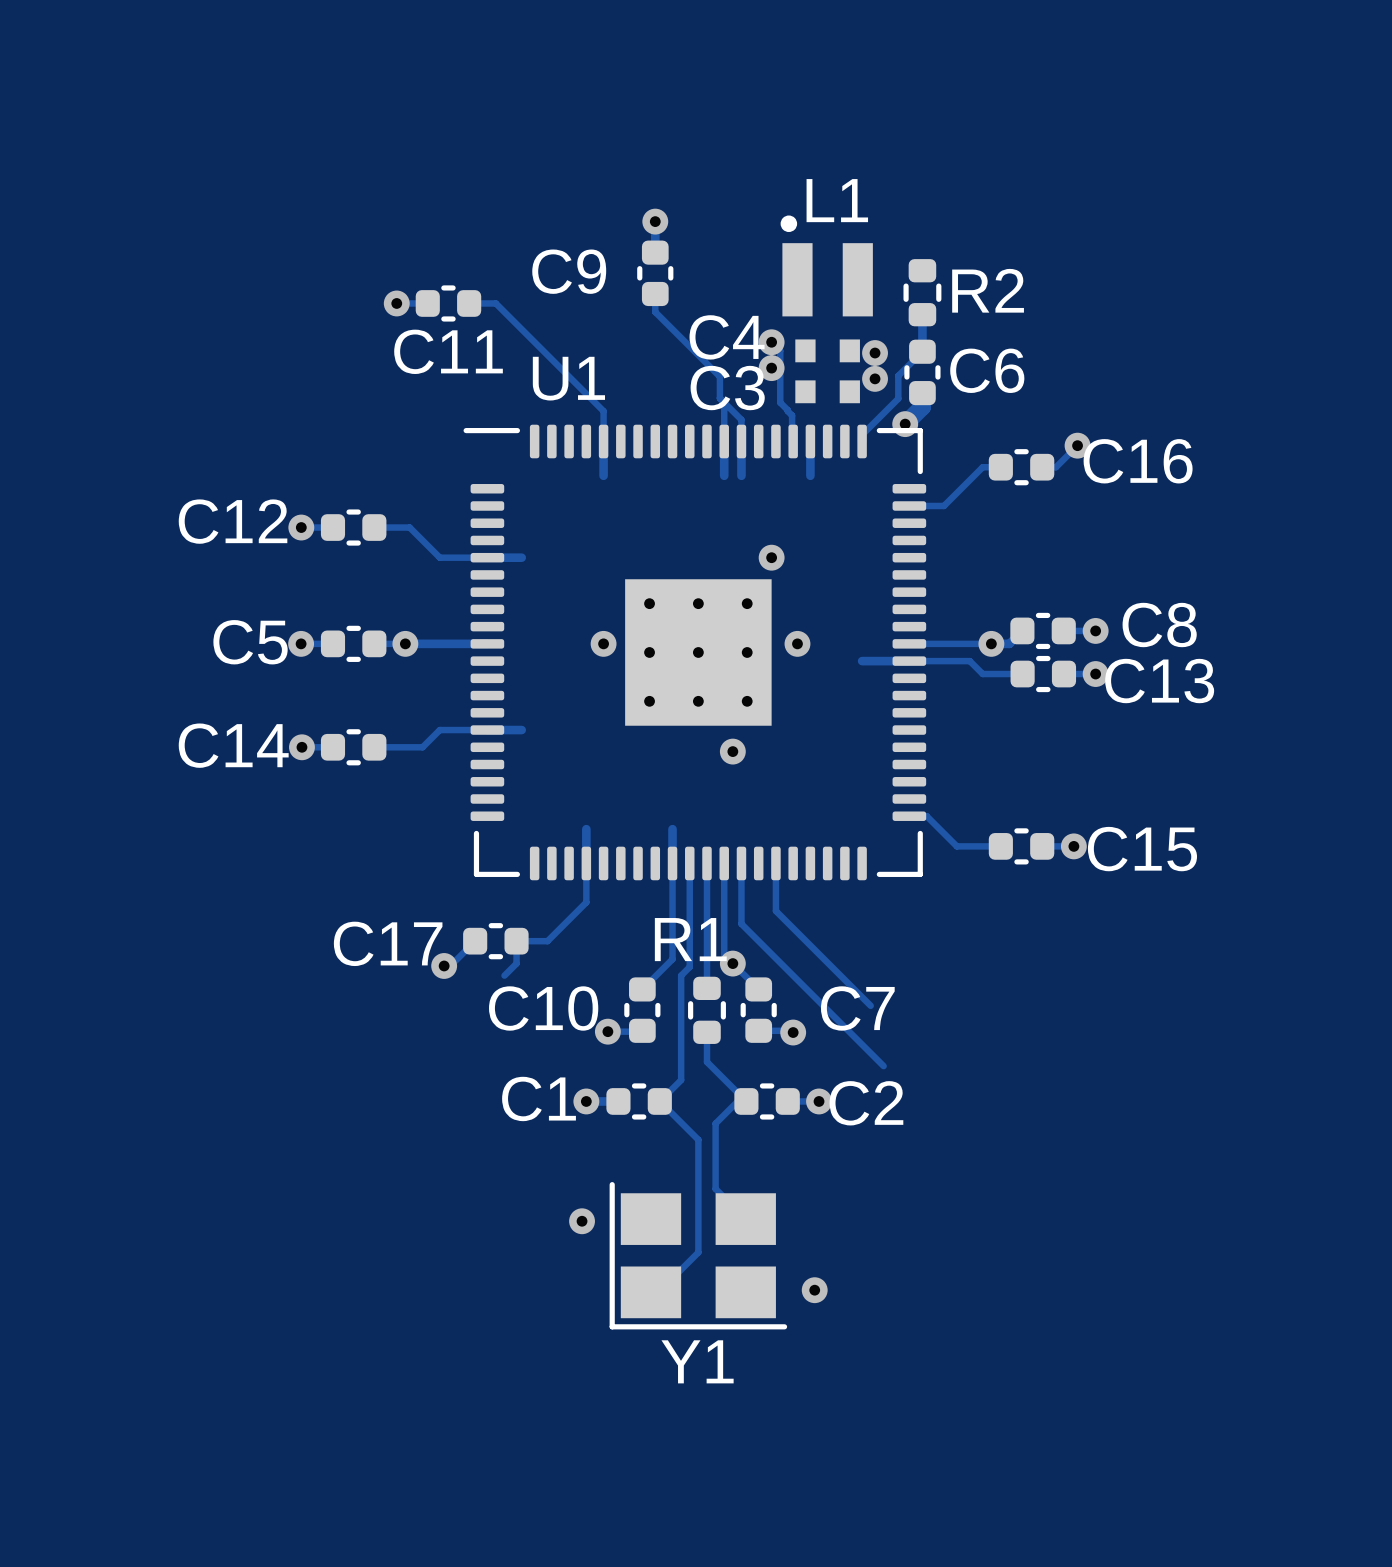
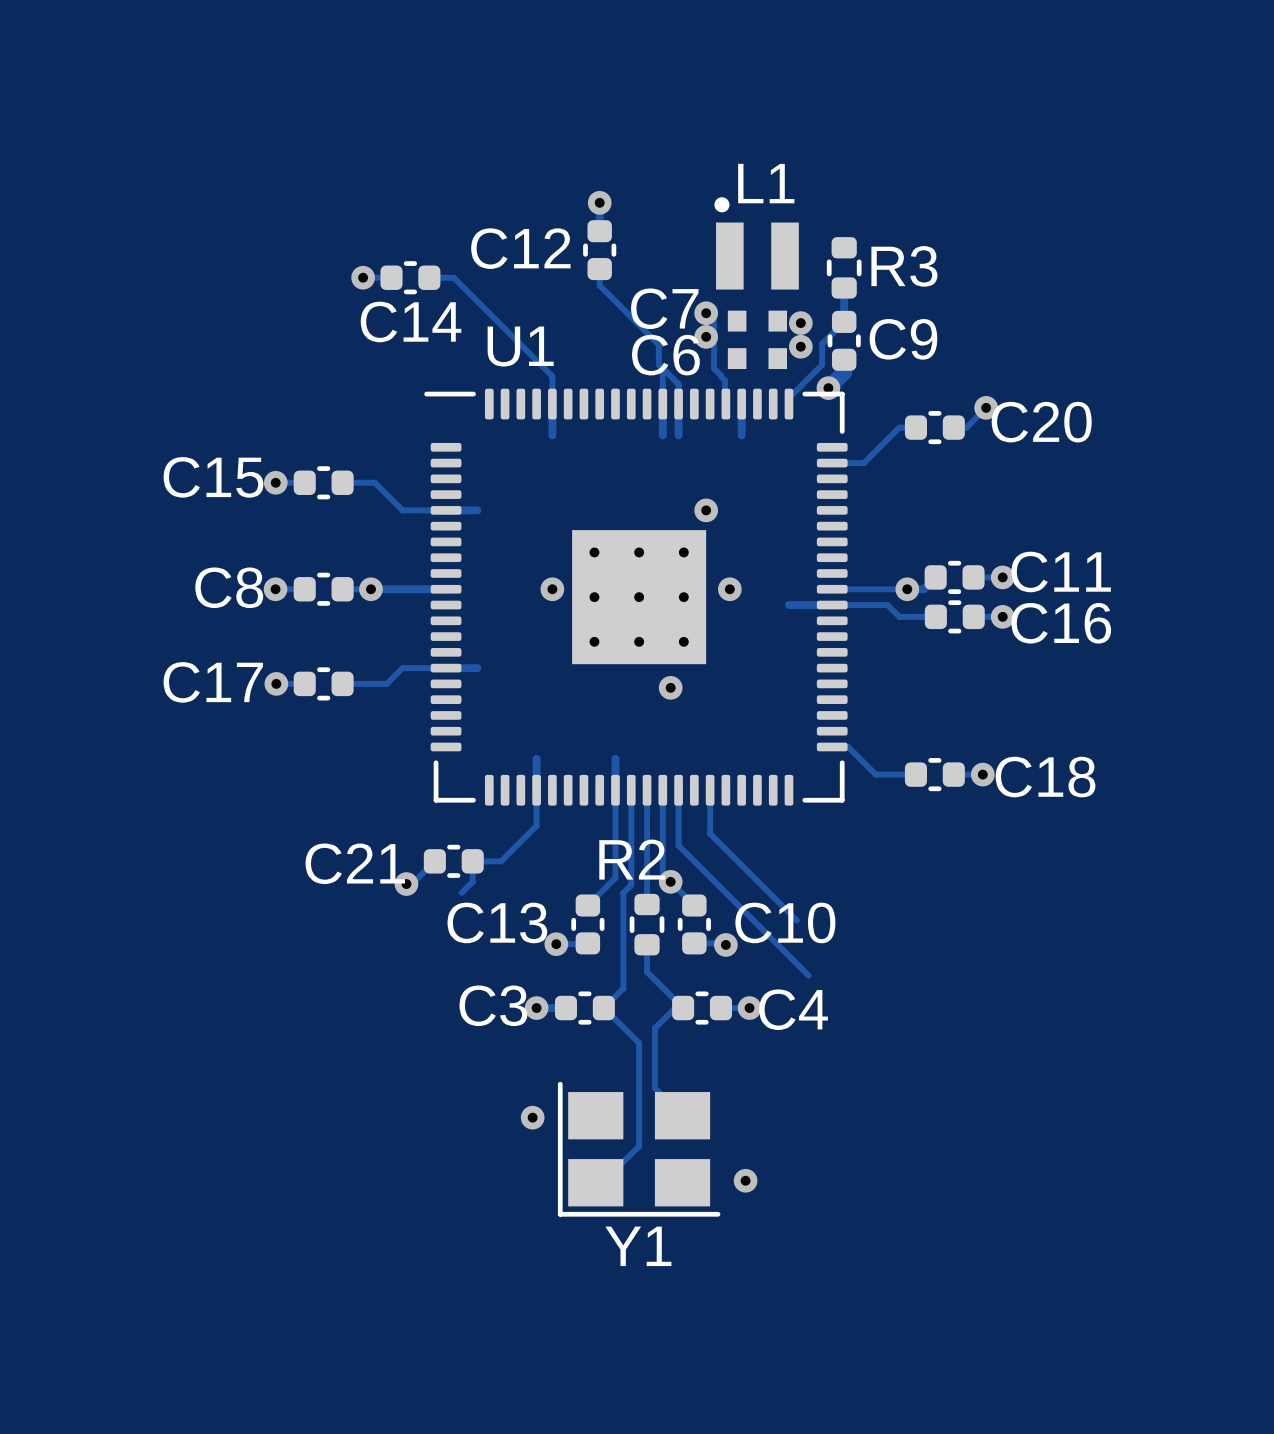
C9 name: C9 (569, 271) -> C12 (520, 248)
R2 name: R2 (988, 290) -> R3 (904, 266)
C4 name: C4 (727, 337) -> C7 (664, 308)
C11 name: C11 (448, 351) -> C14 (411, 321)
C6 name: C6 (987, 370) -> C9 (903, 339)
C3 name: C3 (727, 388) -> C6 (665, 355)
C16 name: C16 (1138, 461) -> C20 (1041, 422)
C12 name: C12 (233, 521) -> C15 (213, 477)
C8 name: C8 (1159, 625) -> C11 (1061, 571)
C5 name: C5 (250, 642) -> C8 (229, 587)
C13 name: C13 (1159, 681) -> C16 (1061, 623)
C14 name: C14 (233, 745) -> C17 (213, 682)
C15 name: C15 (1142, 849) -> C18 (1045, 777)
R1 name: R1 (690, 939) -> R2 (632, 859)
C17 name: C17 (388, 943) -> C21 (355, 863)
C10 name: C10 (543, 1008) -> C13 (497, 922)
C7 name: C7 (857, 1008) -> C10 (785, 922)
C1 name: C1 (539, 1098) -> C3 (493, 1005)
C2 name: C2 (866, 1103) -> C4 (793, 1009)

